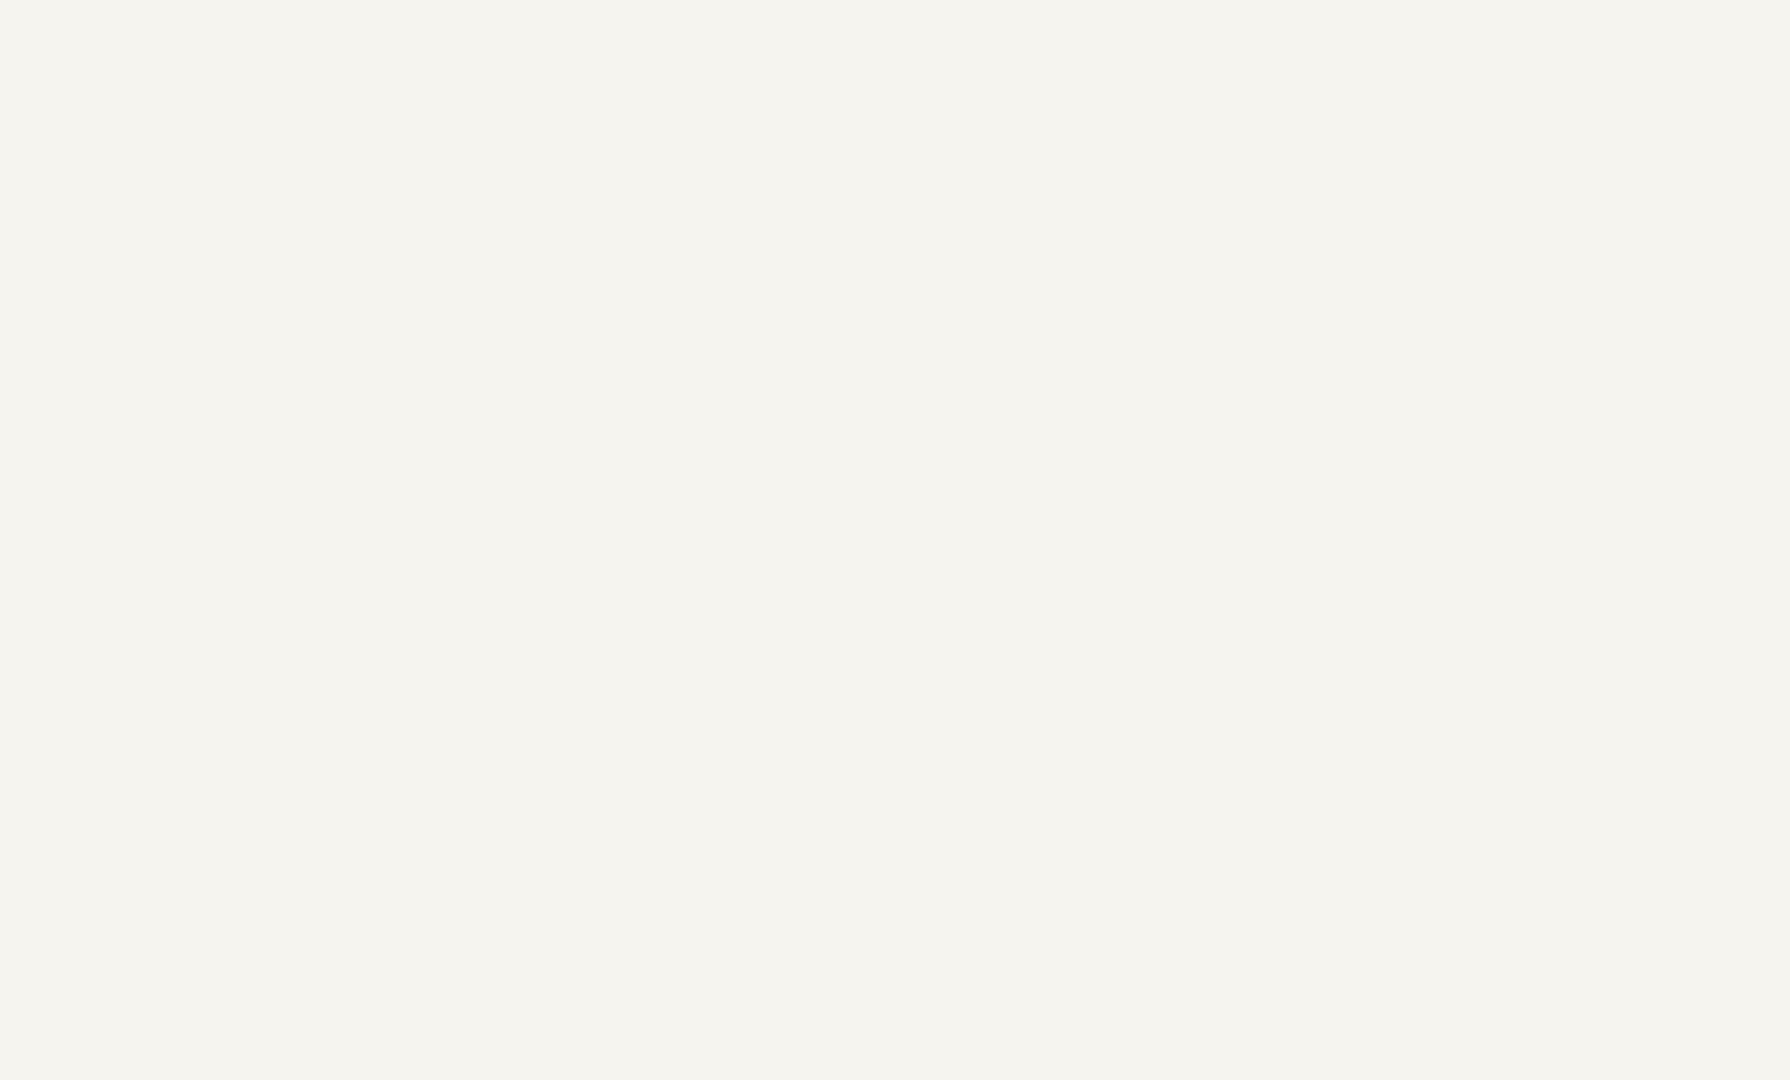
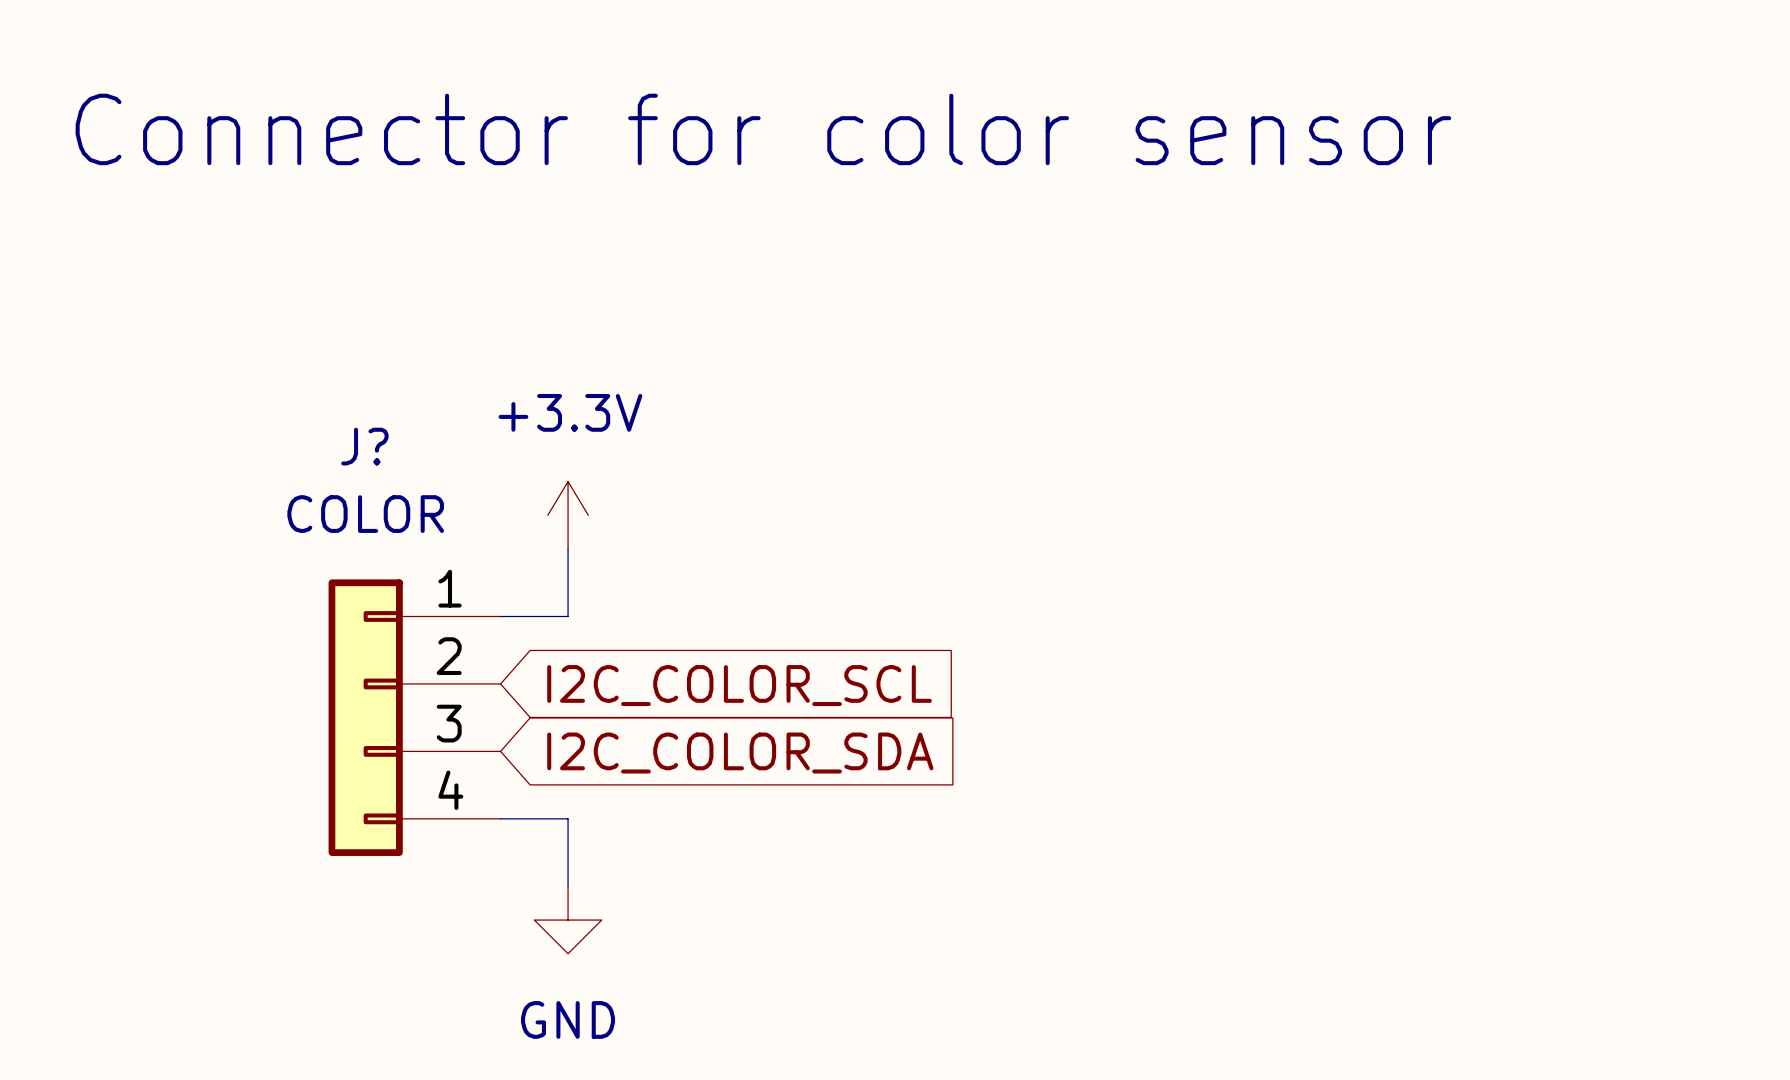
text: none -> Connector for color sensor (763, 129)
power symbol: none -> +3.3V (568, 515)
wire: none -> (568, 549) (568, 616) (500, 616)
global label: none -> I2C_COLOR_SCL (739, 685)
J?: none -> COLOR (414, 717)
global label: none -> I2C_COLOR_SDA (740, 753)
wire: none -> (500, 818) (568, 818) (568, 886)
power symbol: none -> GND (568, 920)

